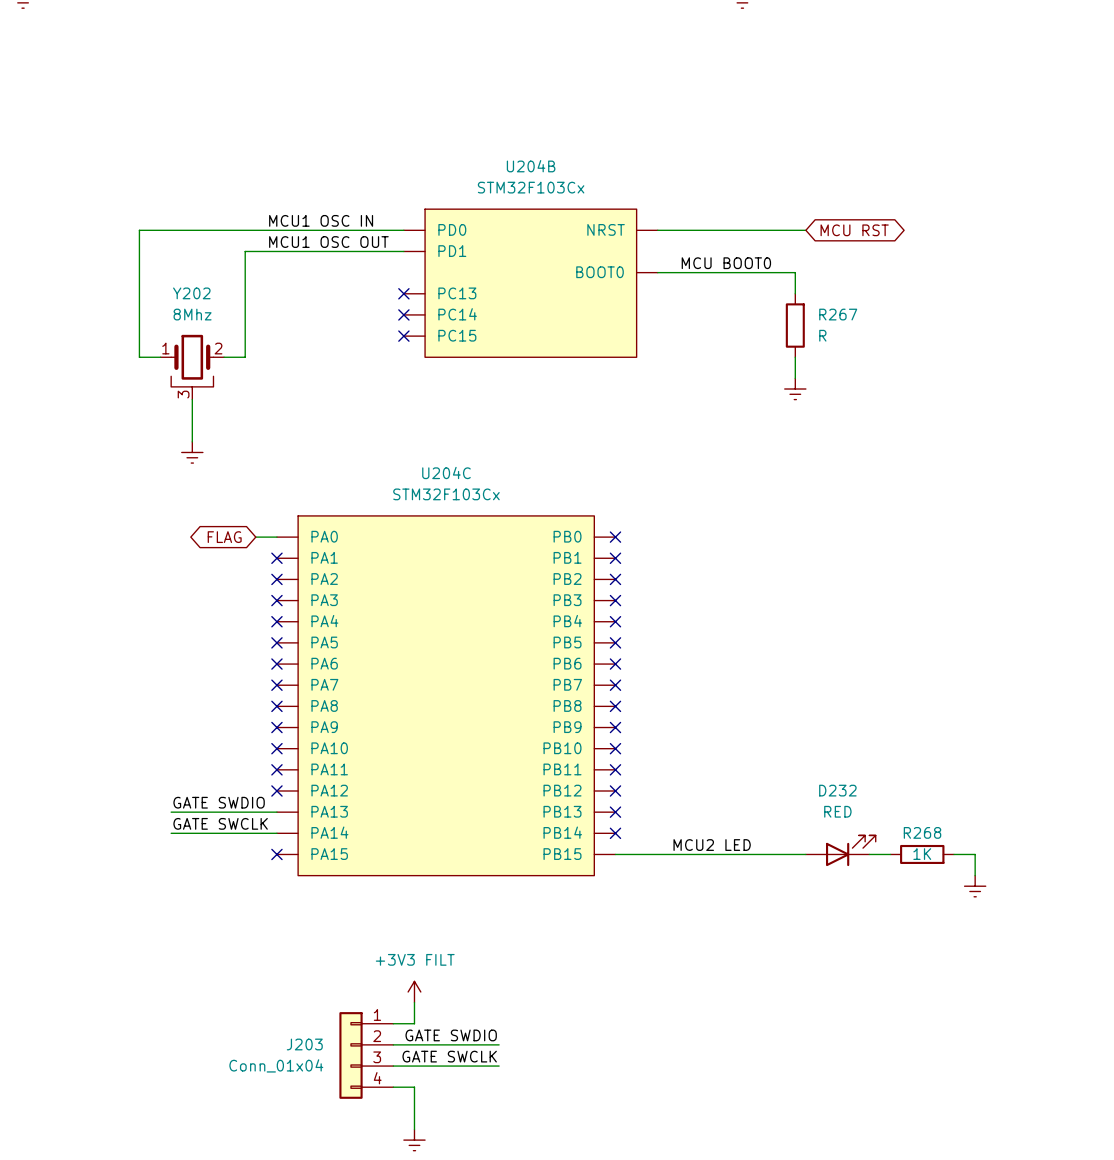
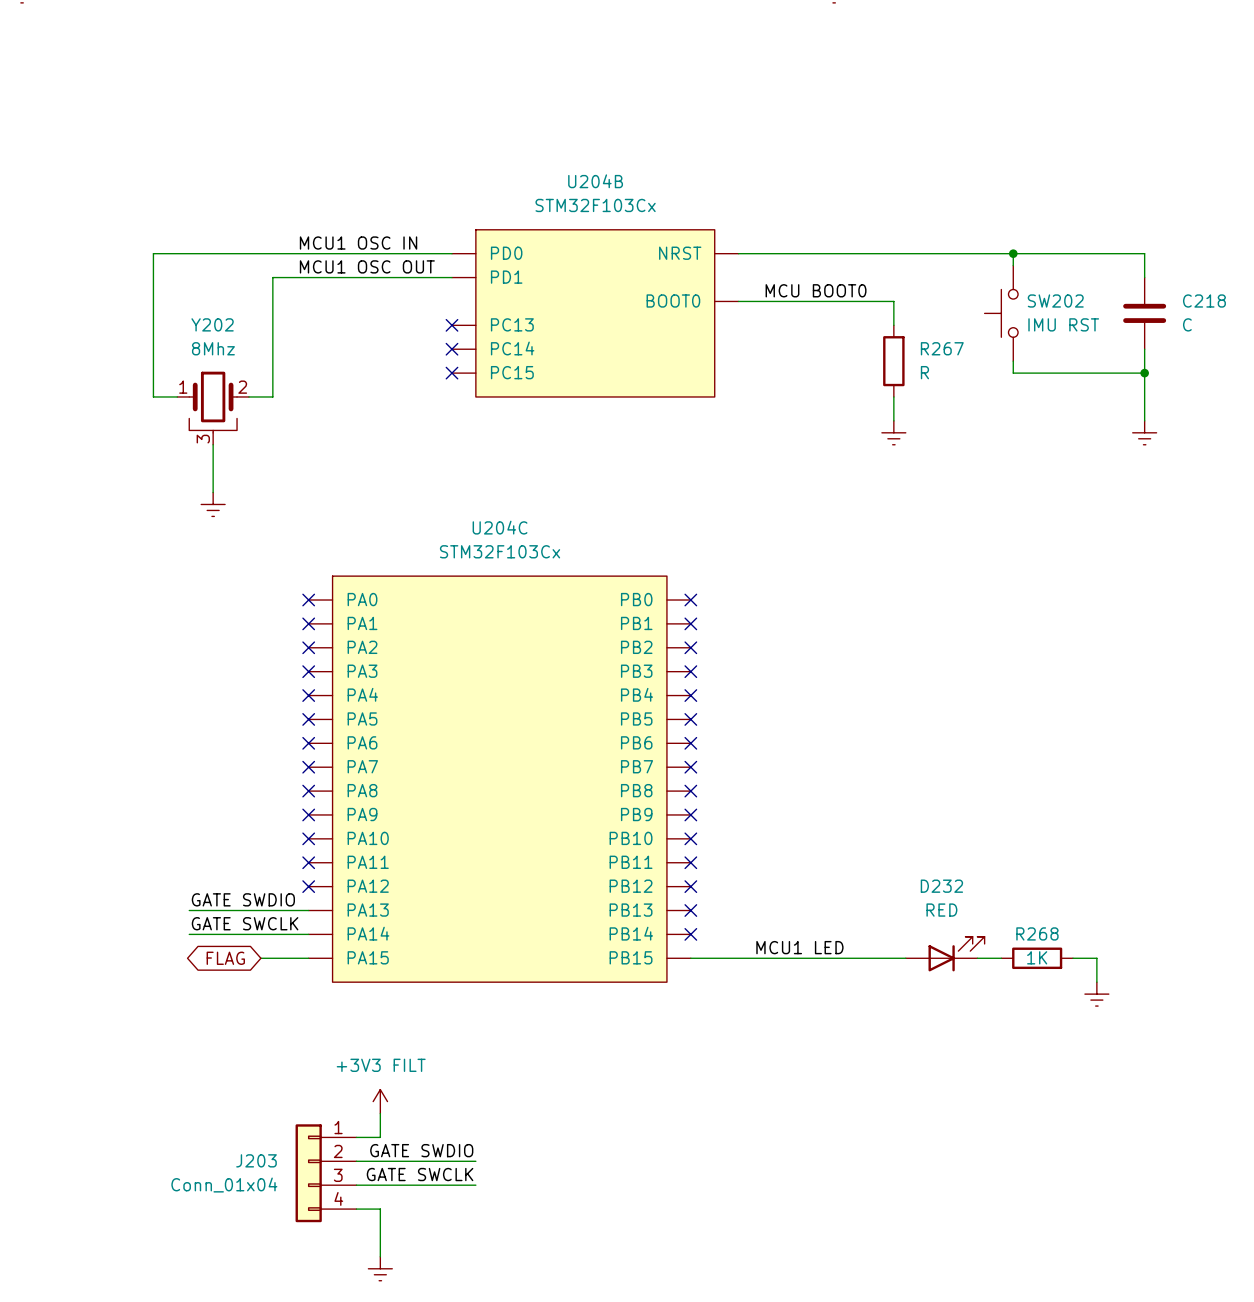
wire: none -> (905, 253) (1144, 253) (1144, 277)
global label: MCU RST (854, 230) -> none
wire: none -> (1013, 253) (1013, 265)
junction: none -> (1013, 253)
SW202: none -> IMU RST (1001, 313)
C218: none -> C (1144, 313)
wire: none -> (1144, 349) (1144, 420)
wire: none -> (1013, 361) (1013, 373) (1144, 373)
junction: none -> (1144, 373)
power symbol: none -> (1144, 432)
global label: FLAG (224, 537) -> none
wire: (255, 537) (276, 537) -> none
no-connect mark: none -> (308, 600)
label: MCU2 LED (712, 845) -> MCU1 LED (799, 947)
global label: none -> FLAG (225, 958)
wire: none -> (260, 958) (308, 958)
no-connect mark: (276, 854) -> none
power symbol position: +3V3 FILT (414, 991) -> +3V3 FILT (380, 1101)
wire: (414, 1002) (414, 1023) (393, 1023) -> (380, 1113) (380, 1137) (356, 1137)
label position: GATE SWDIO (451, 1035) -> GATE SWDIO (421, 1150)
wire: (393, 1044) (499, 1044) -> (356, 1161) (475, 1161)
J203 position: (366, 1055) -> (325, 1173)
label position: GATE SWCLK (449, 1056) -> GATE SWCLK (420, 1174)
wire: (393, 1066) (499, 1066) -> (356, 1185) (475, 1185)
wire: (393, 1087) (414, 1087) (414, 1129) -> (356, 1209) (380, 1209) (380, 1256)
power symbol position: (414, 1140) -> (380, 1268)

